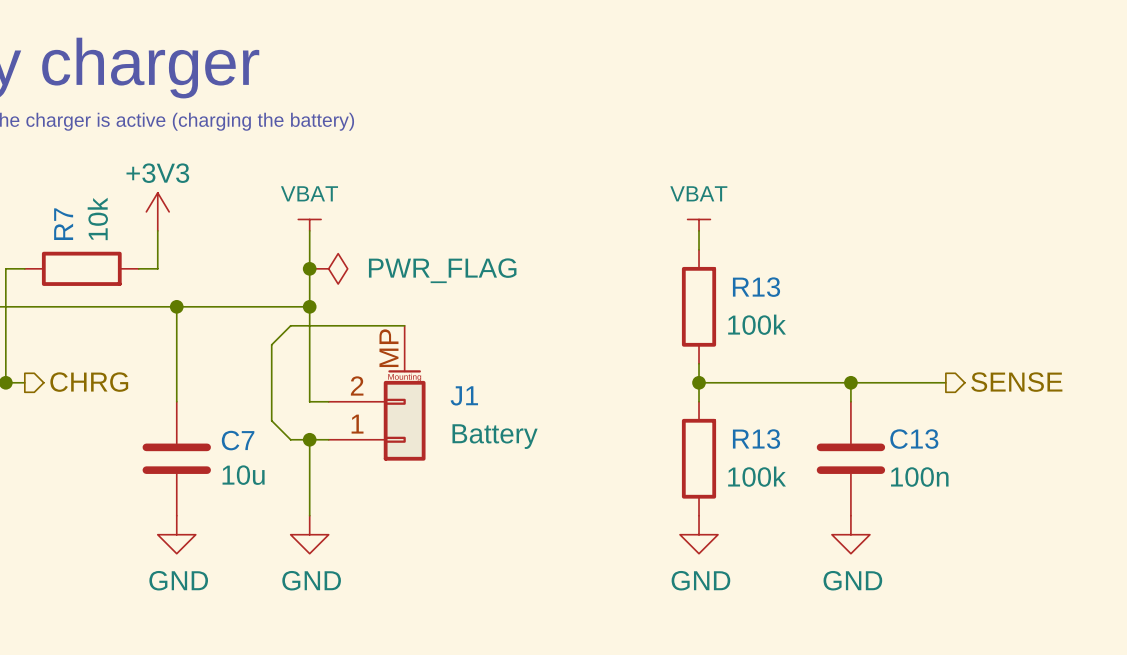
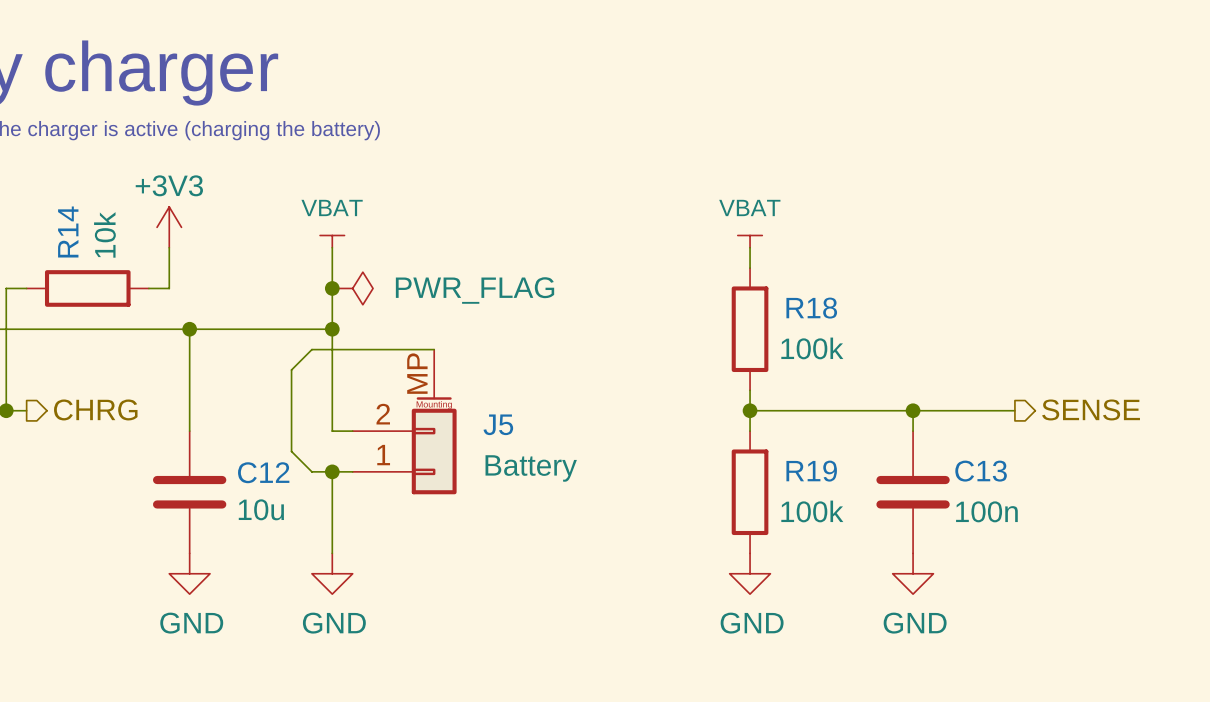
R7 name: R7 (63, 224) -> R14 (68, 231)
R13 name: R13 (756, 287) -> R18 (811, 308)
J1 name: J1 (464, 395) -> J5 (498, 424)
R13 name: R13 (756, 439) -> R19 (811, 471)
C7 name: C7 (238, 440) -> C12 (263, 472)

